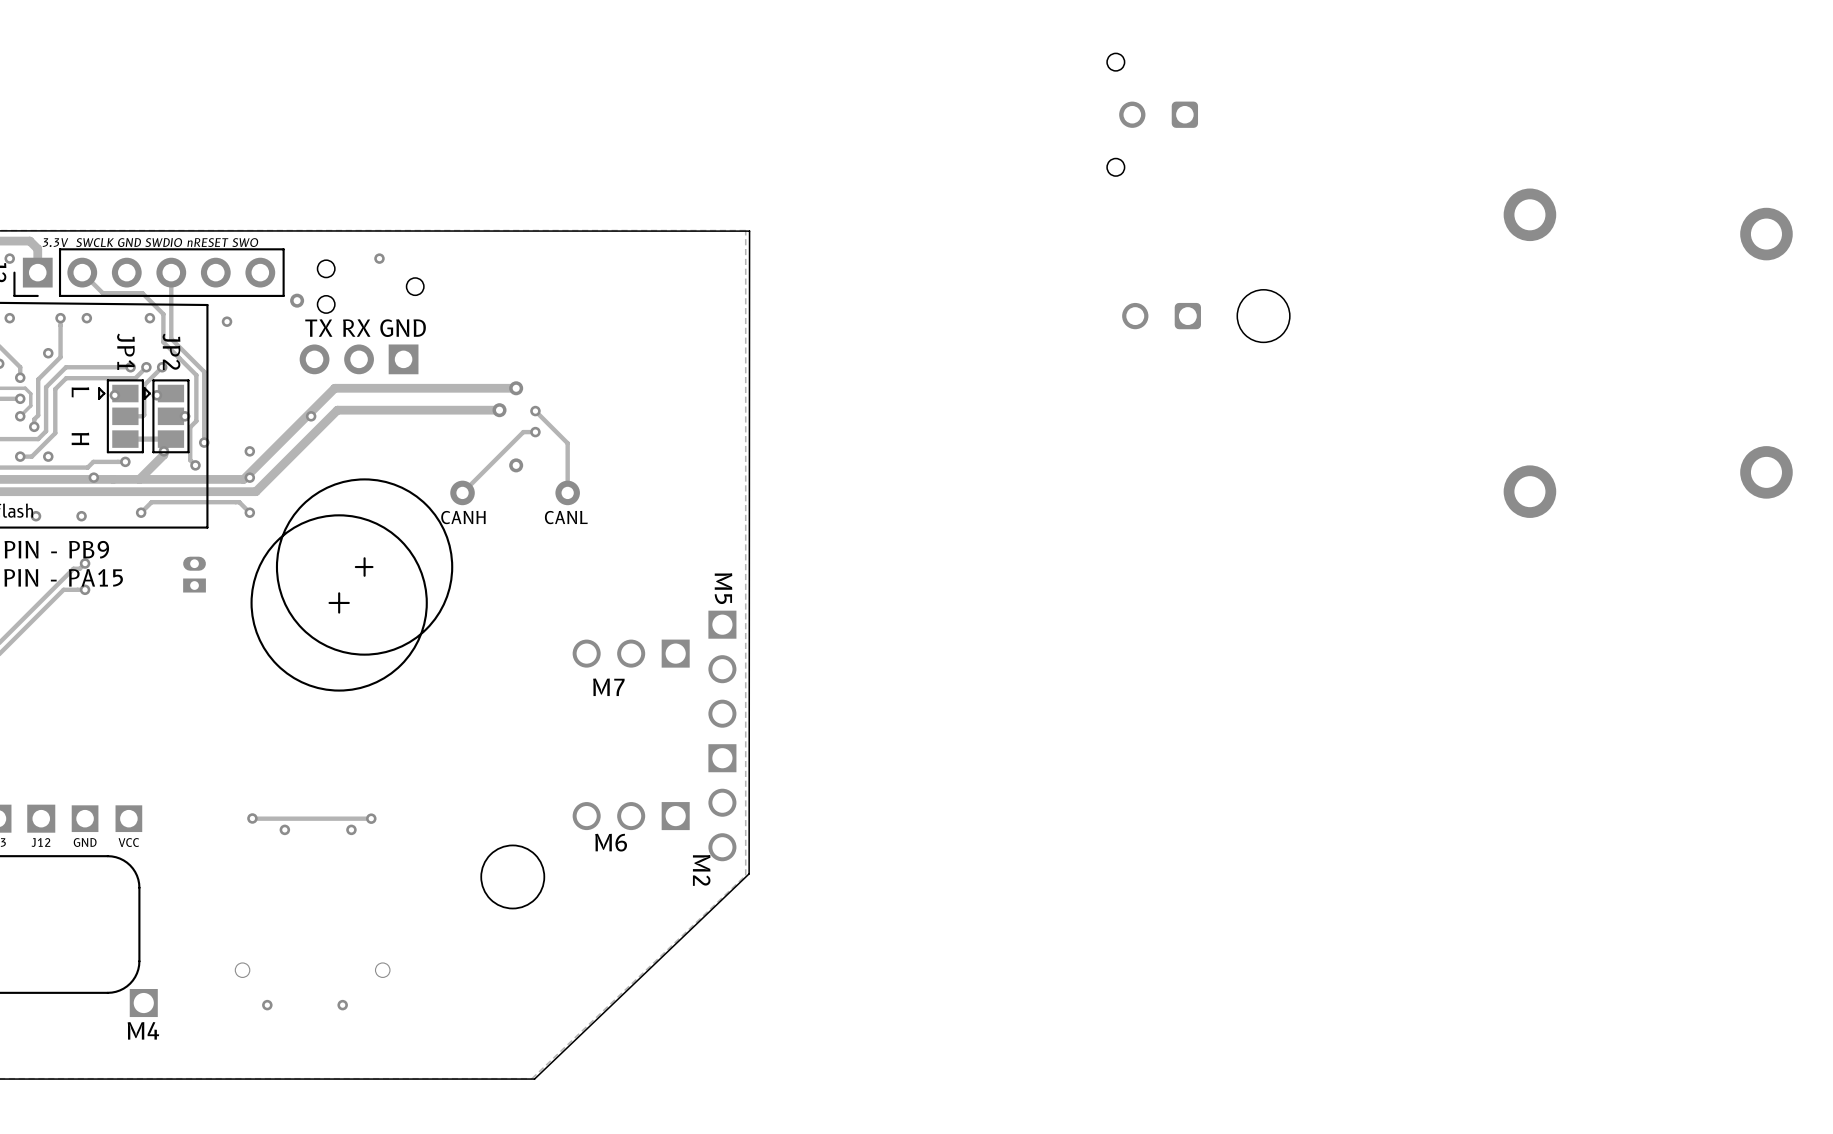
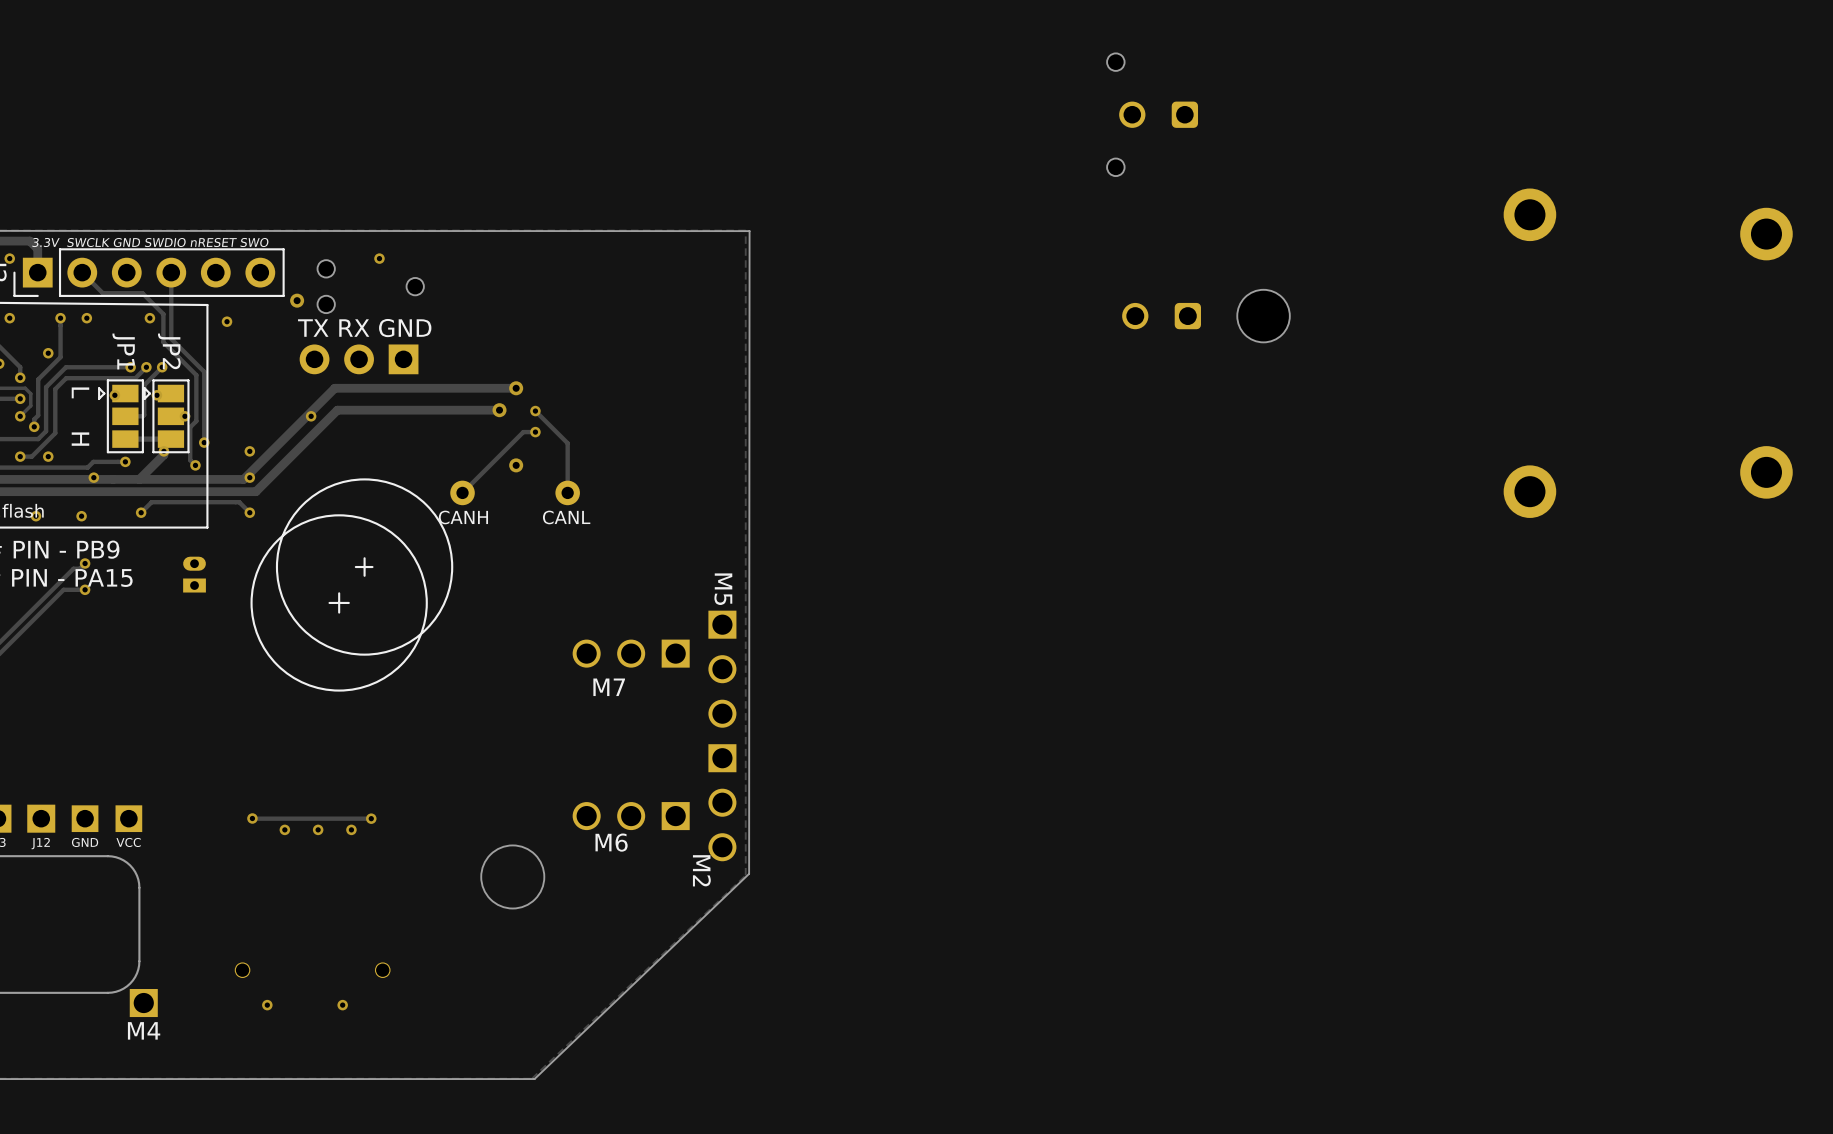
via: none -> (318, 829)

